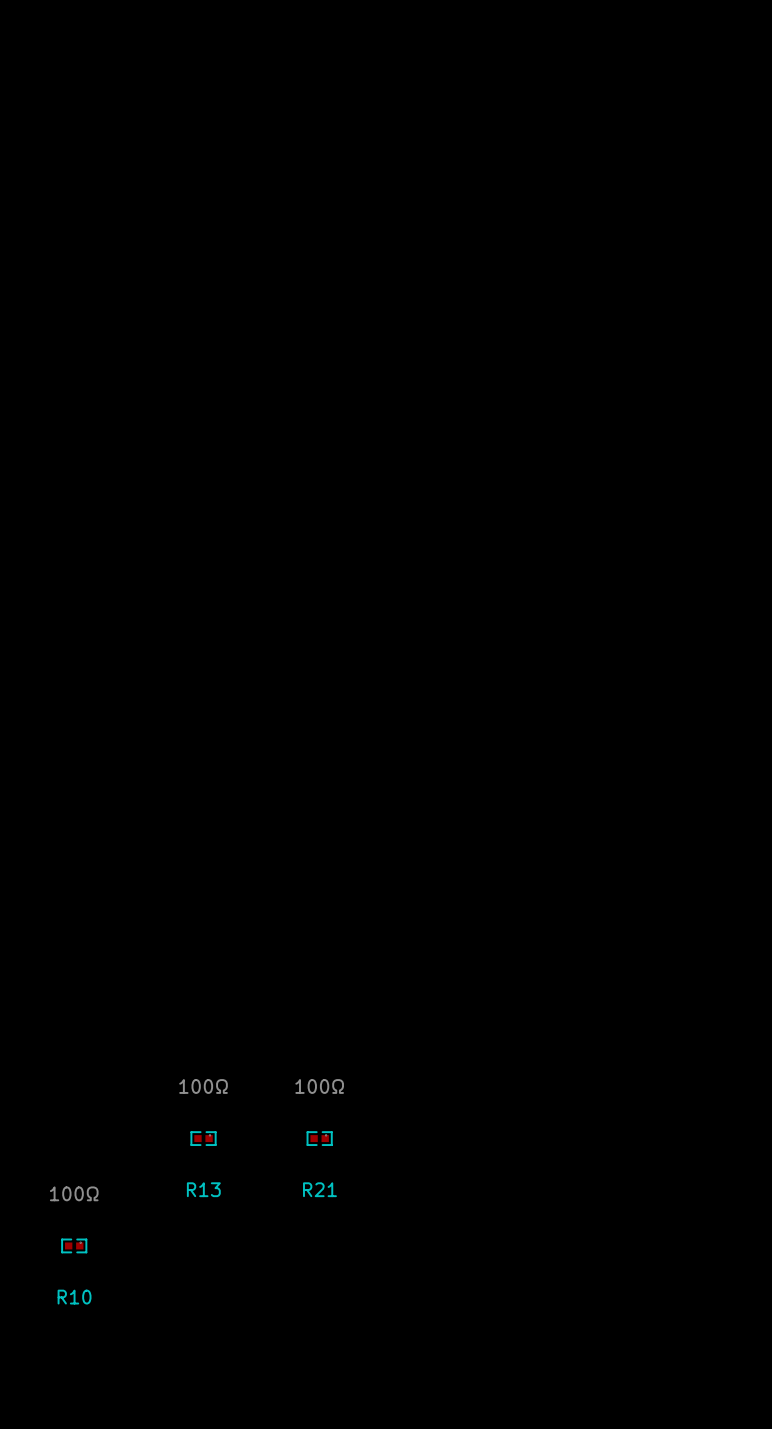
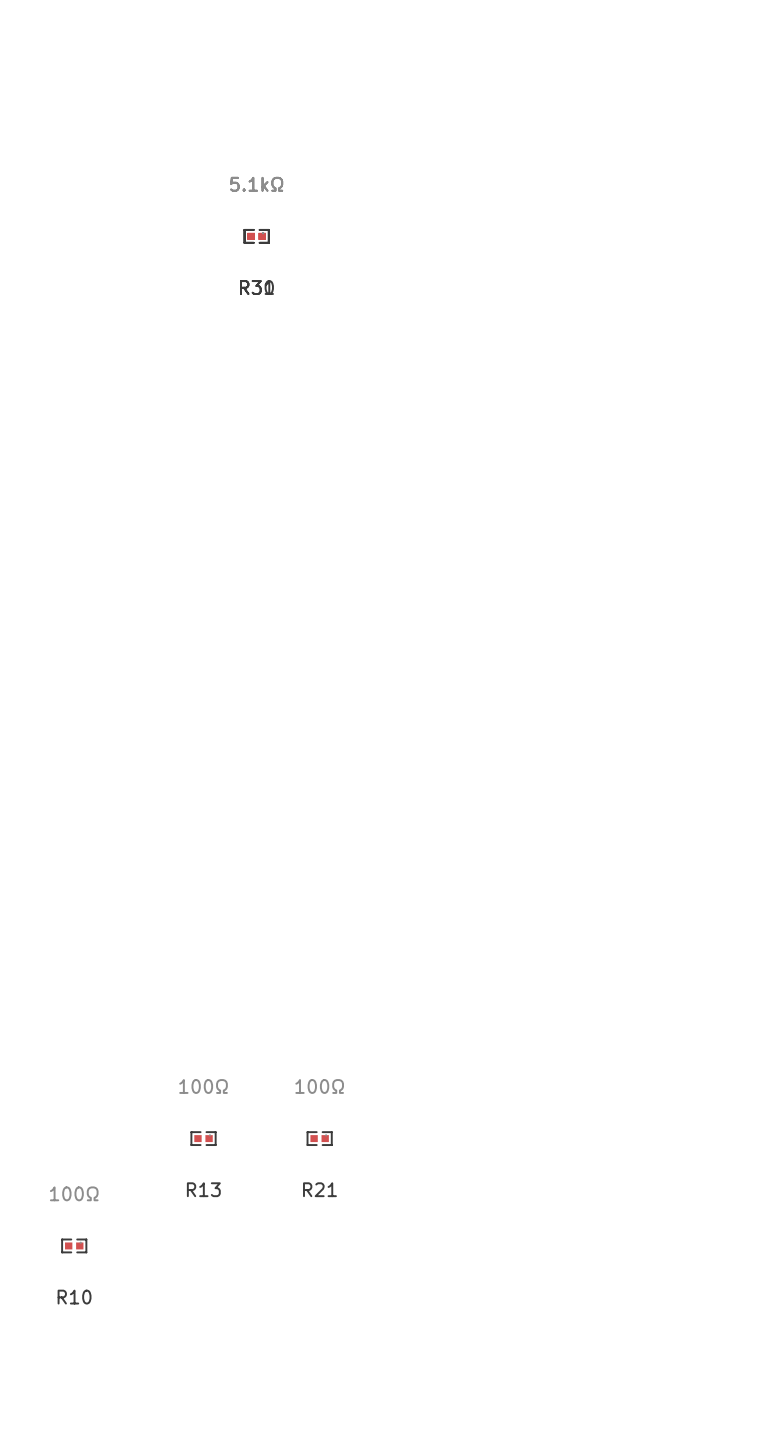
part: none -> 5.1kΩ (256, 236)
part: none -> 5.1kΩ (256, 236)

